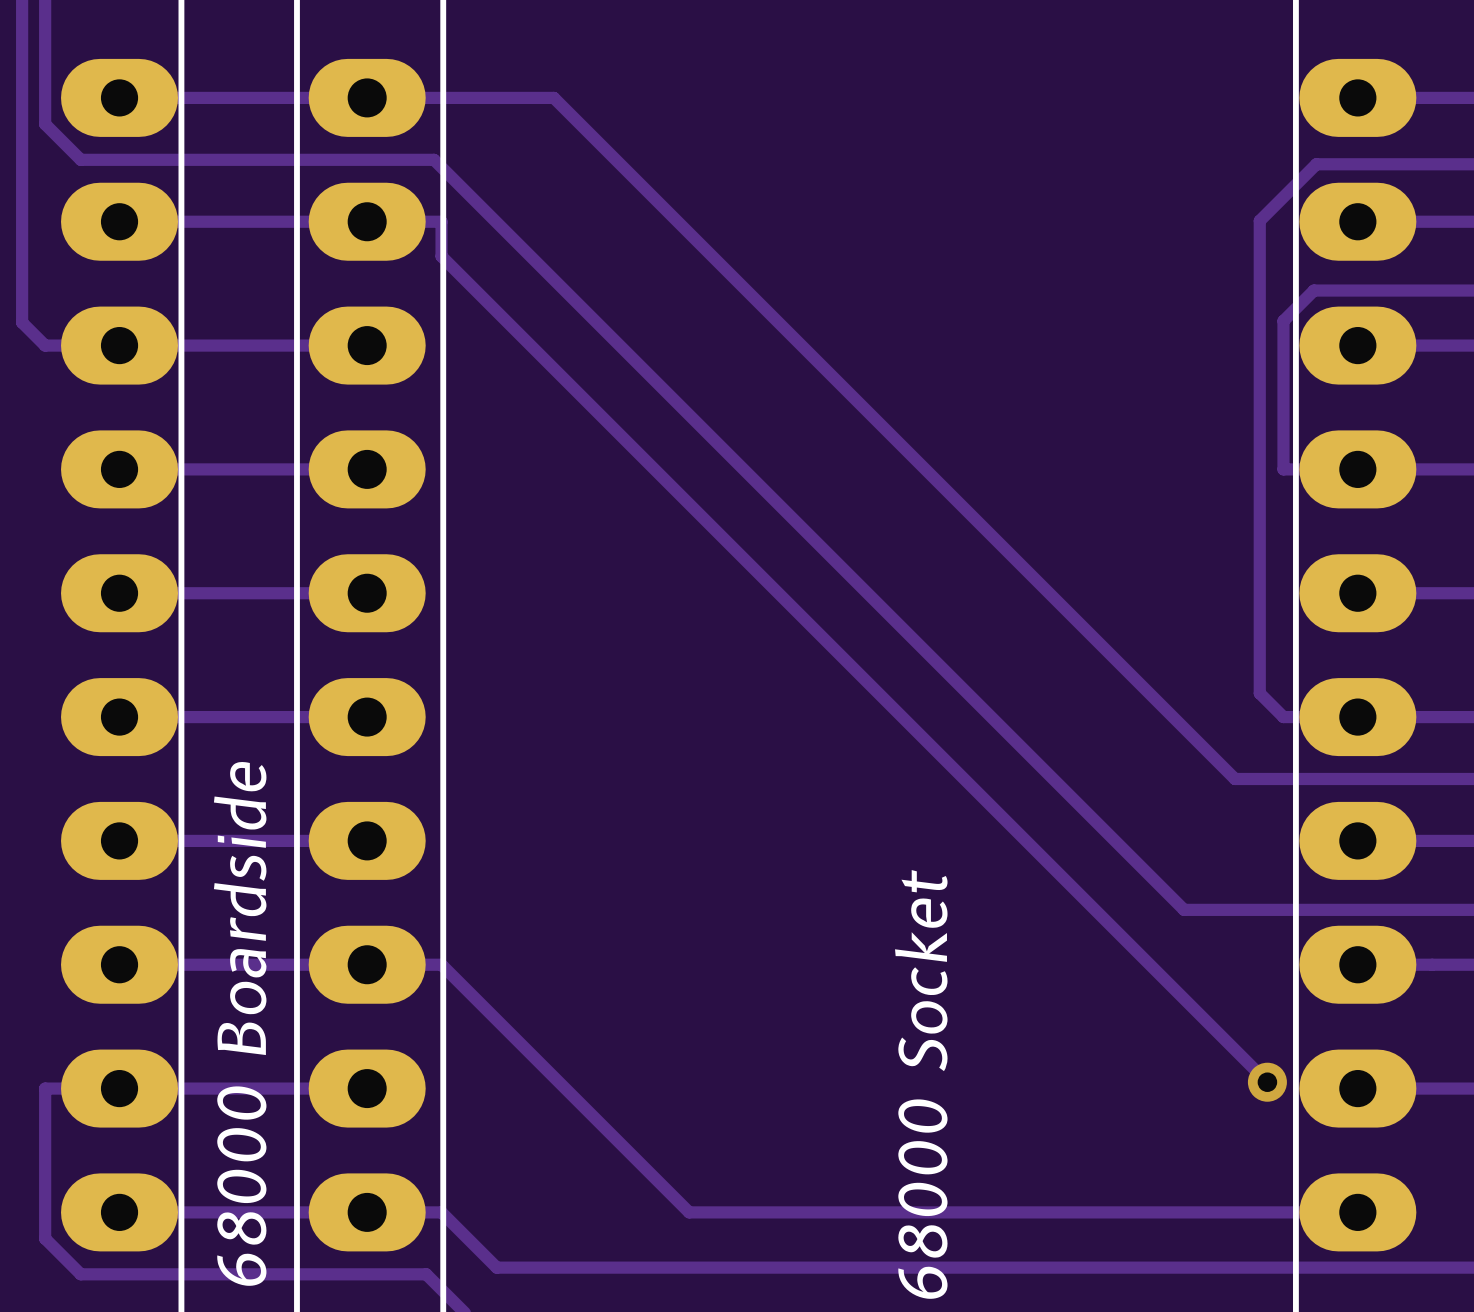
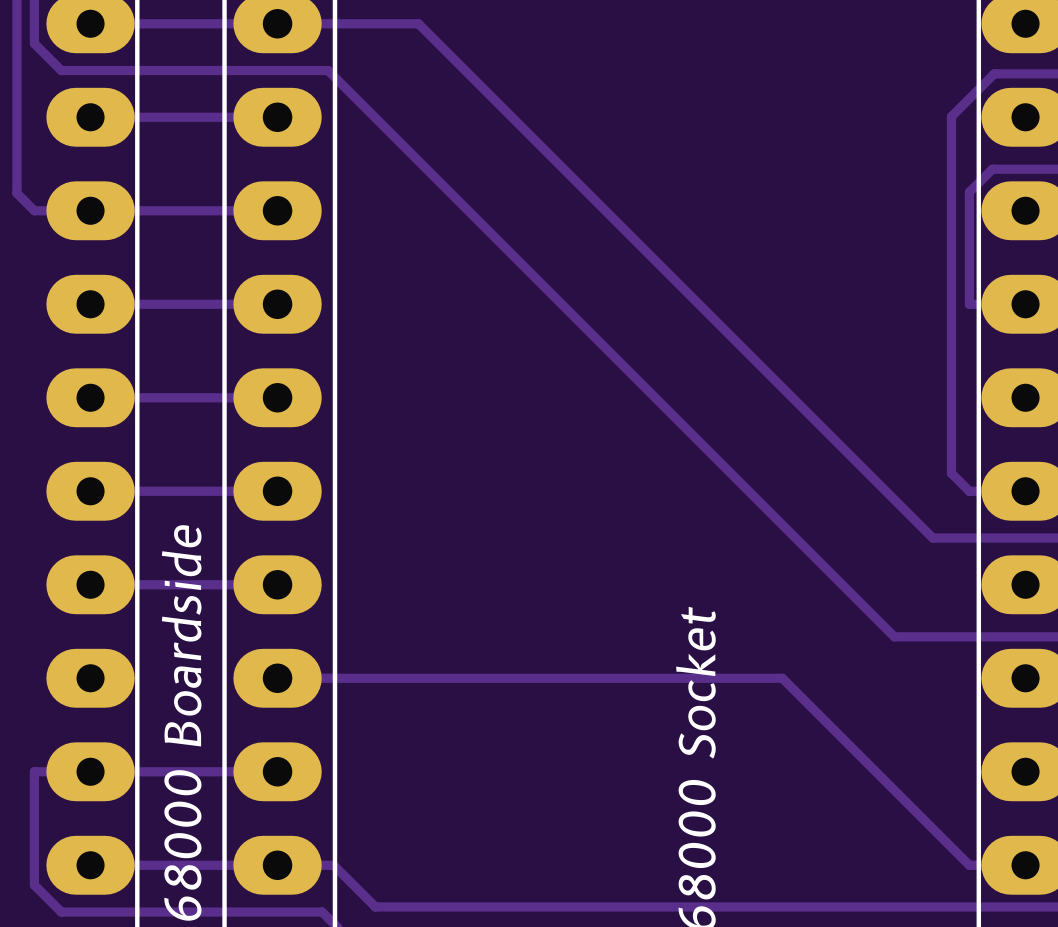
track: (367, 221) (441, 221) (441, 256) (1267, 1082) -> none
track: (119, 964) (367, 964) -> none
track: (441, 964) (689, 1212) (1283, 1212) -> (333, 678) (782, 678) (969, 865)
via: (1267, 1082) -> none

